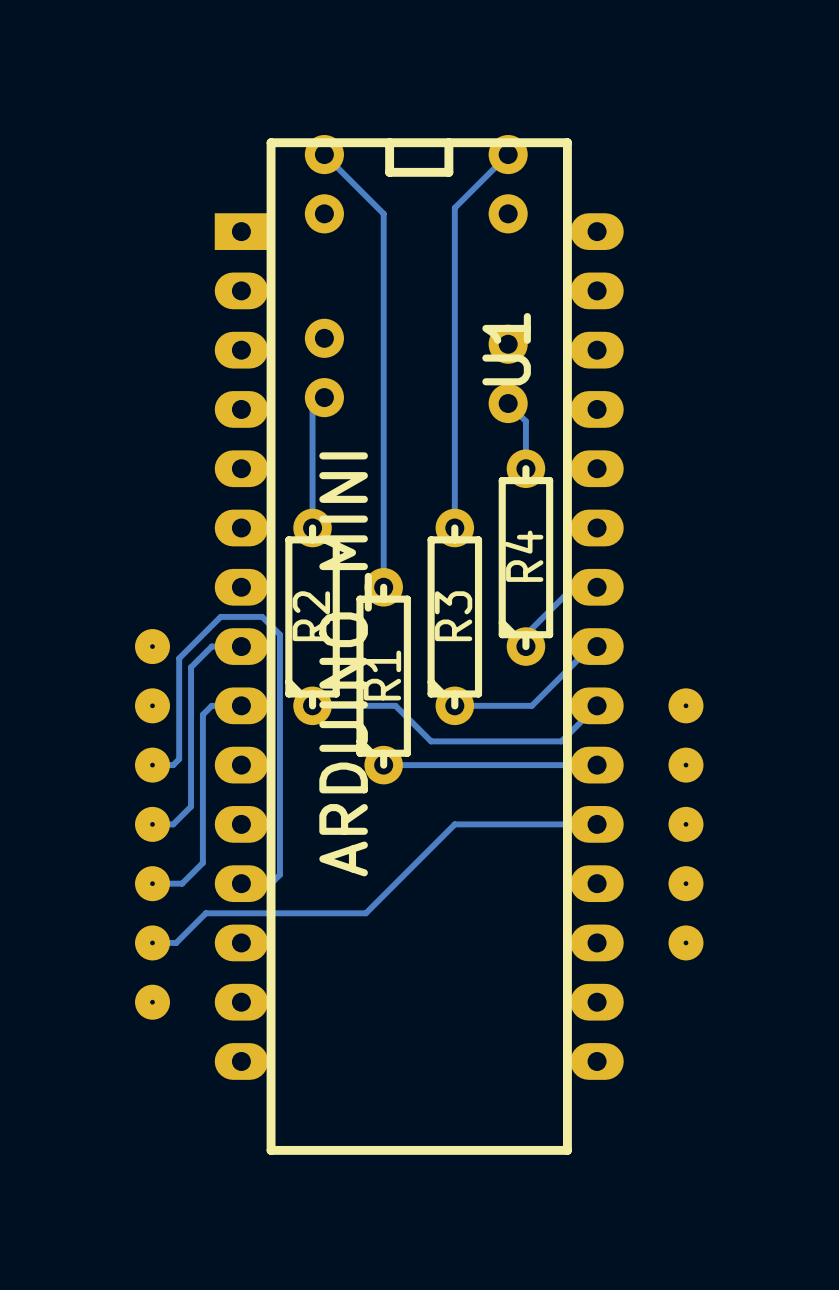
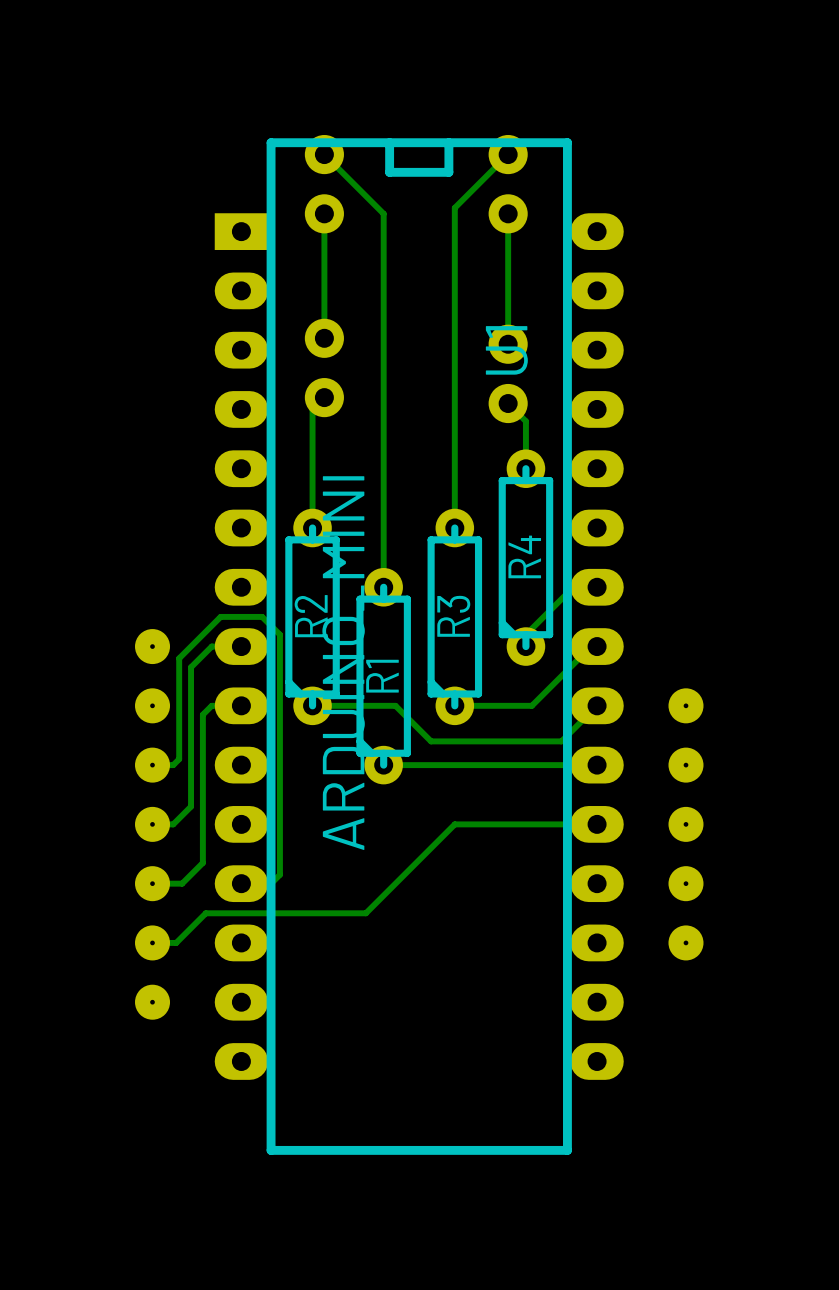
bottom track: none -> (324, 213) (324, 338)
bottom track: none -> (508, 213) (508, 344)

